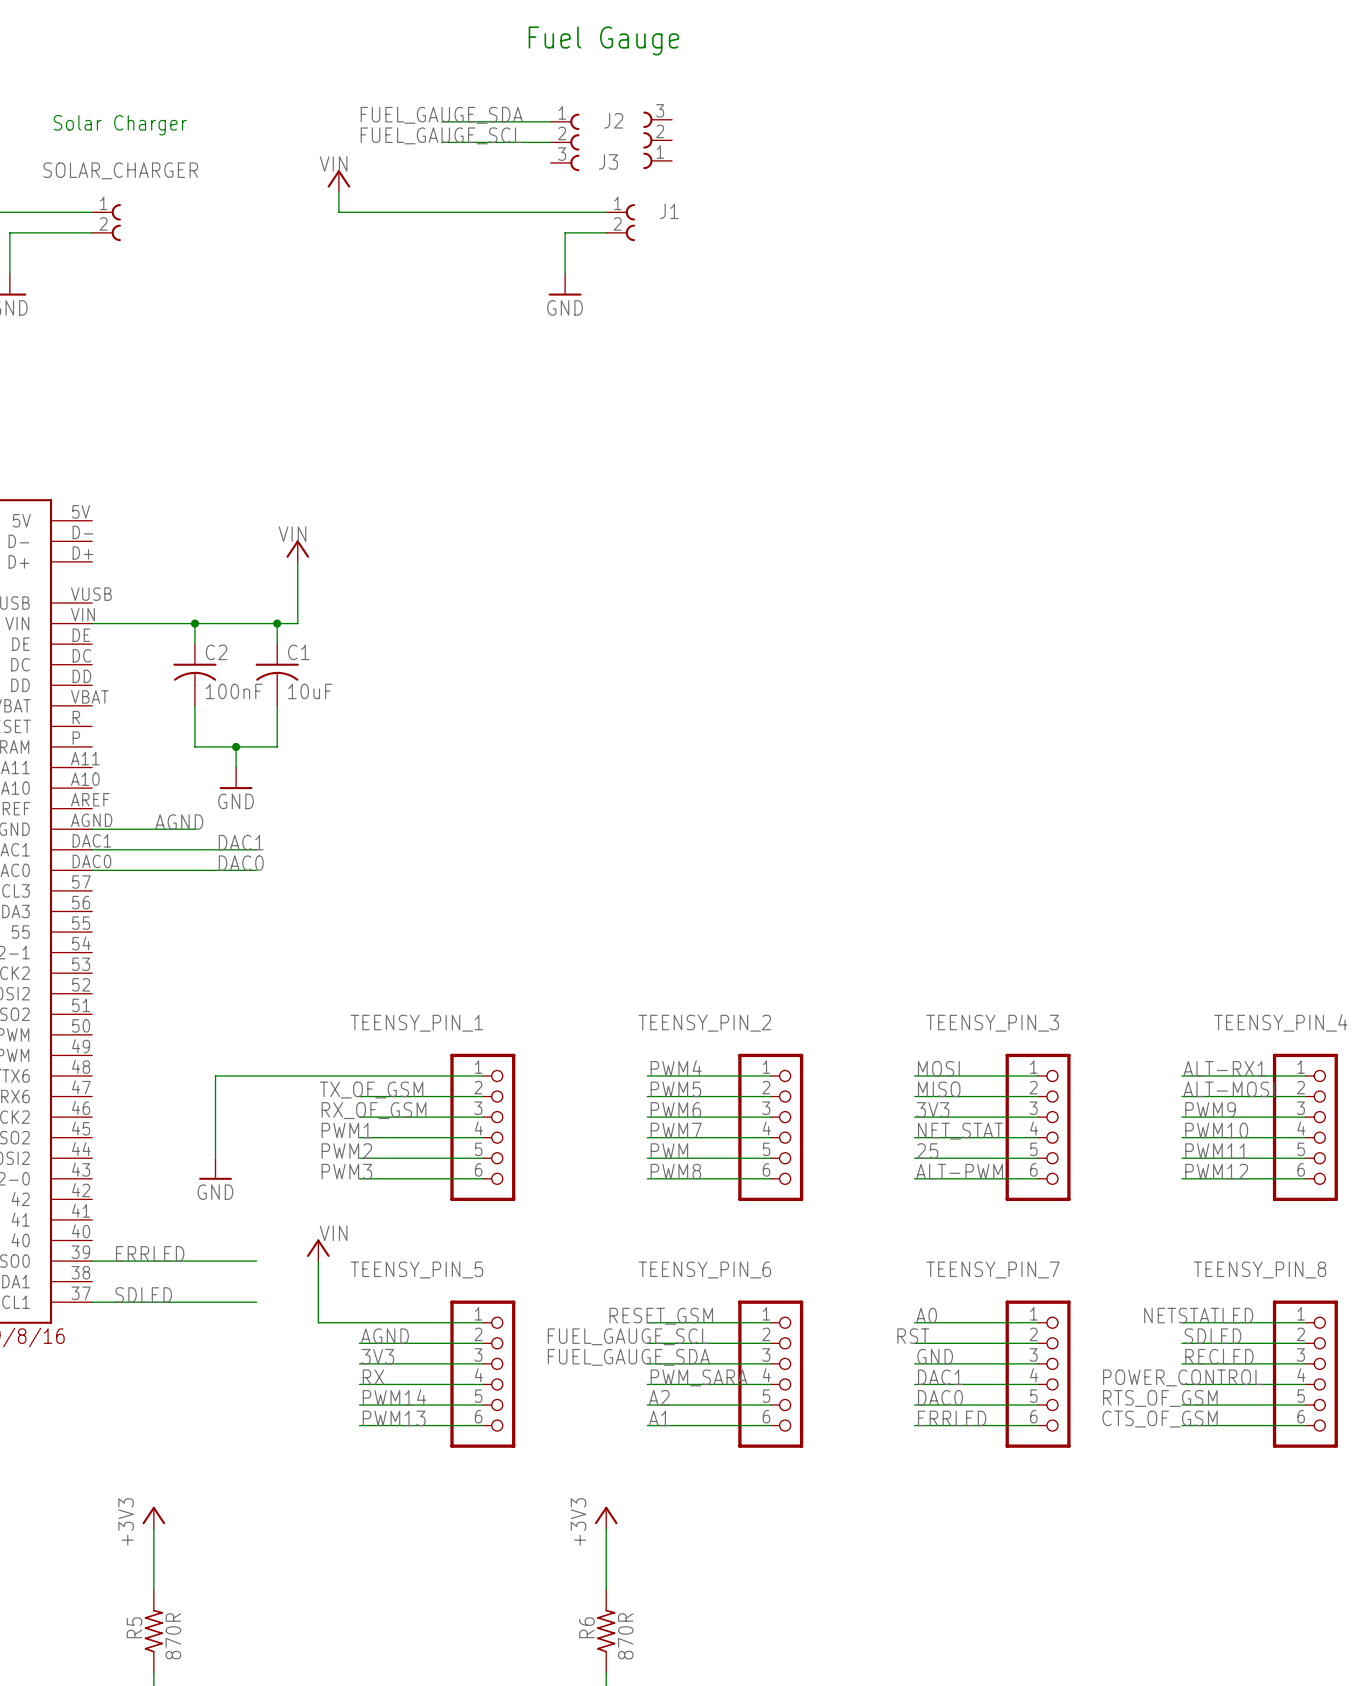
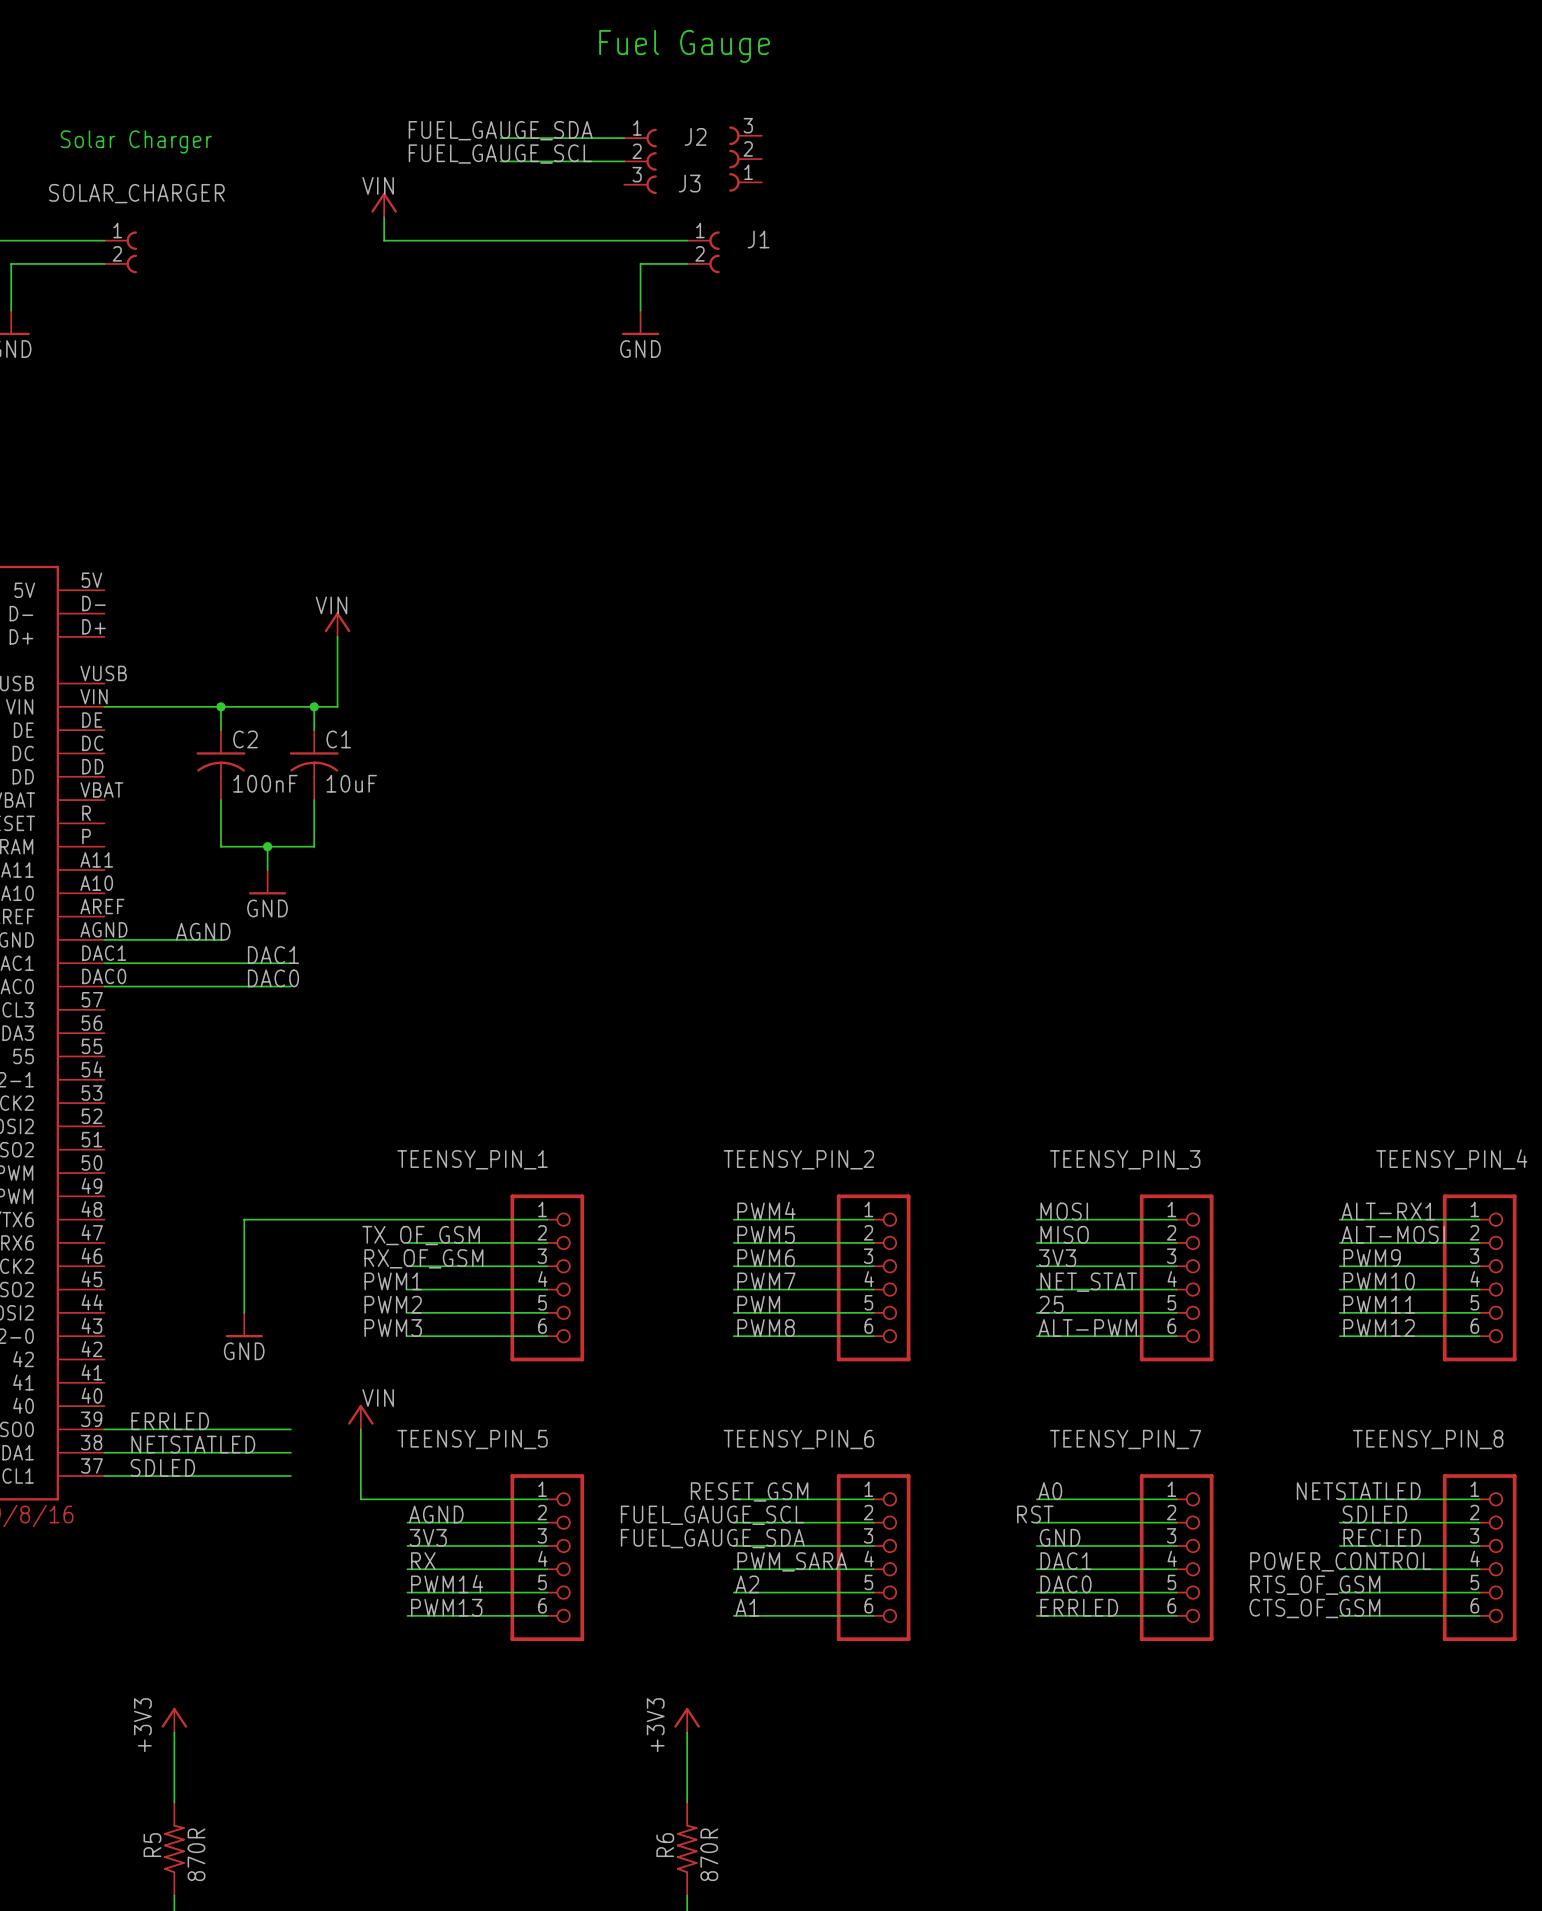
label: none -> NETSTATLED (193, 1444)
wire: none -> (104, 1452) (290, 1452)

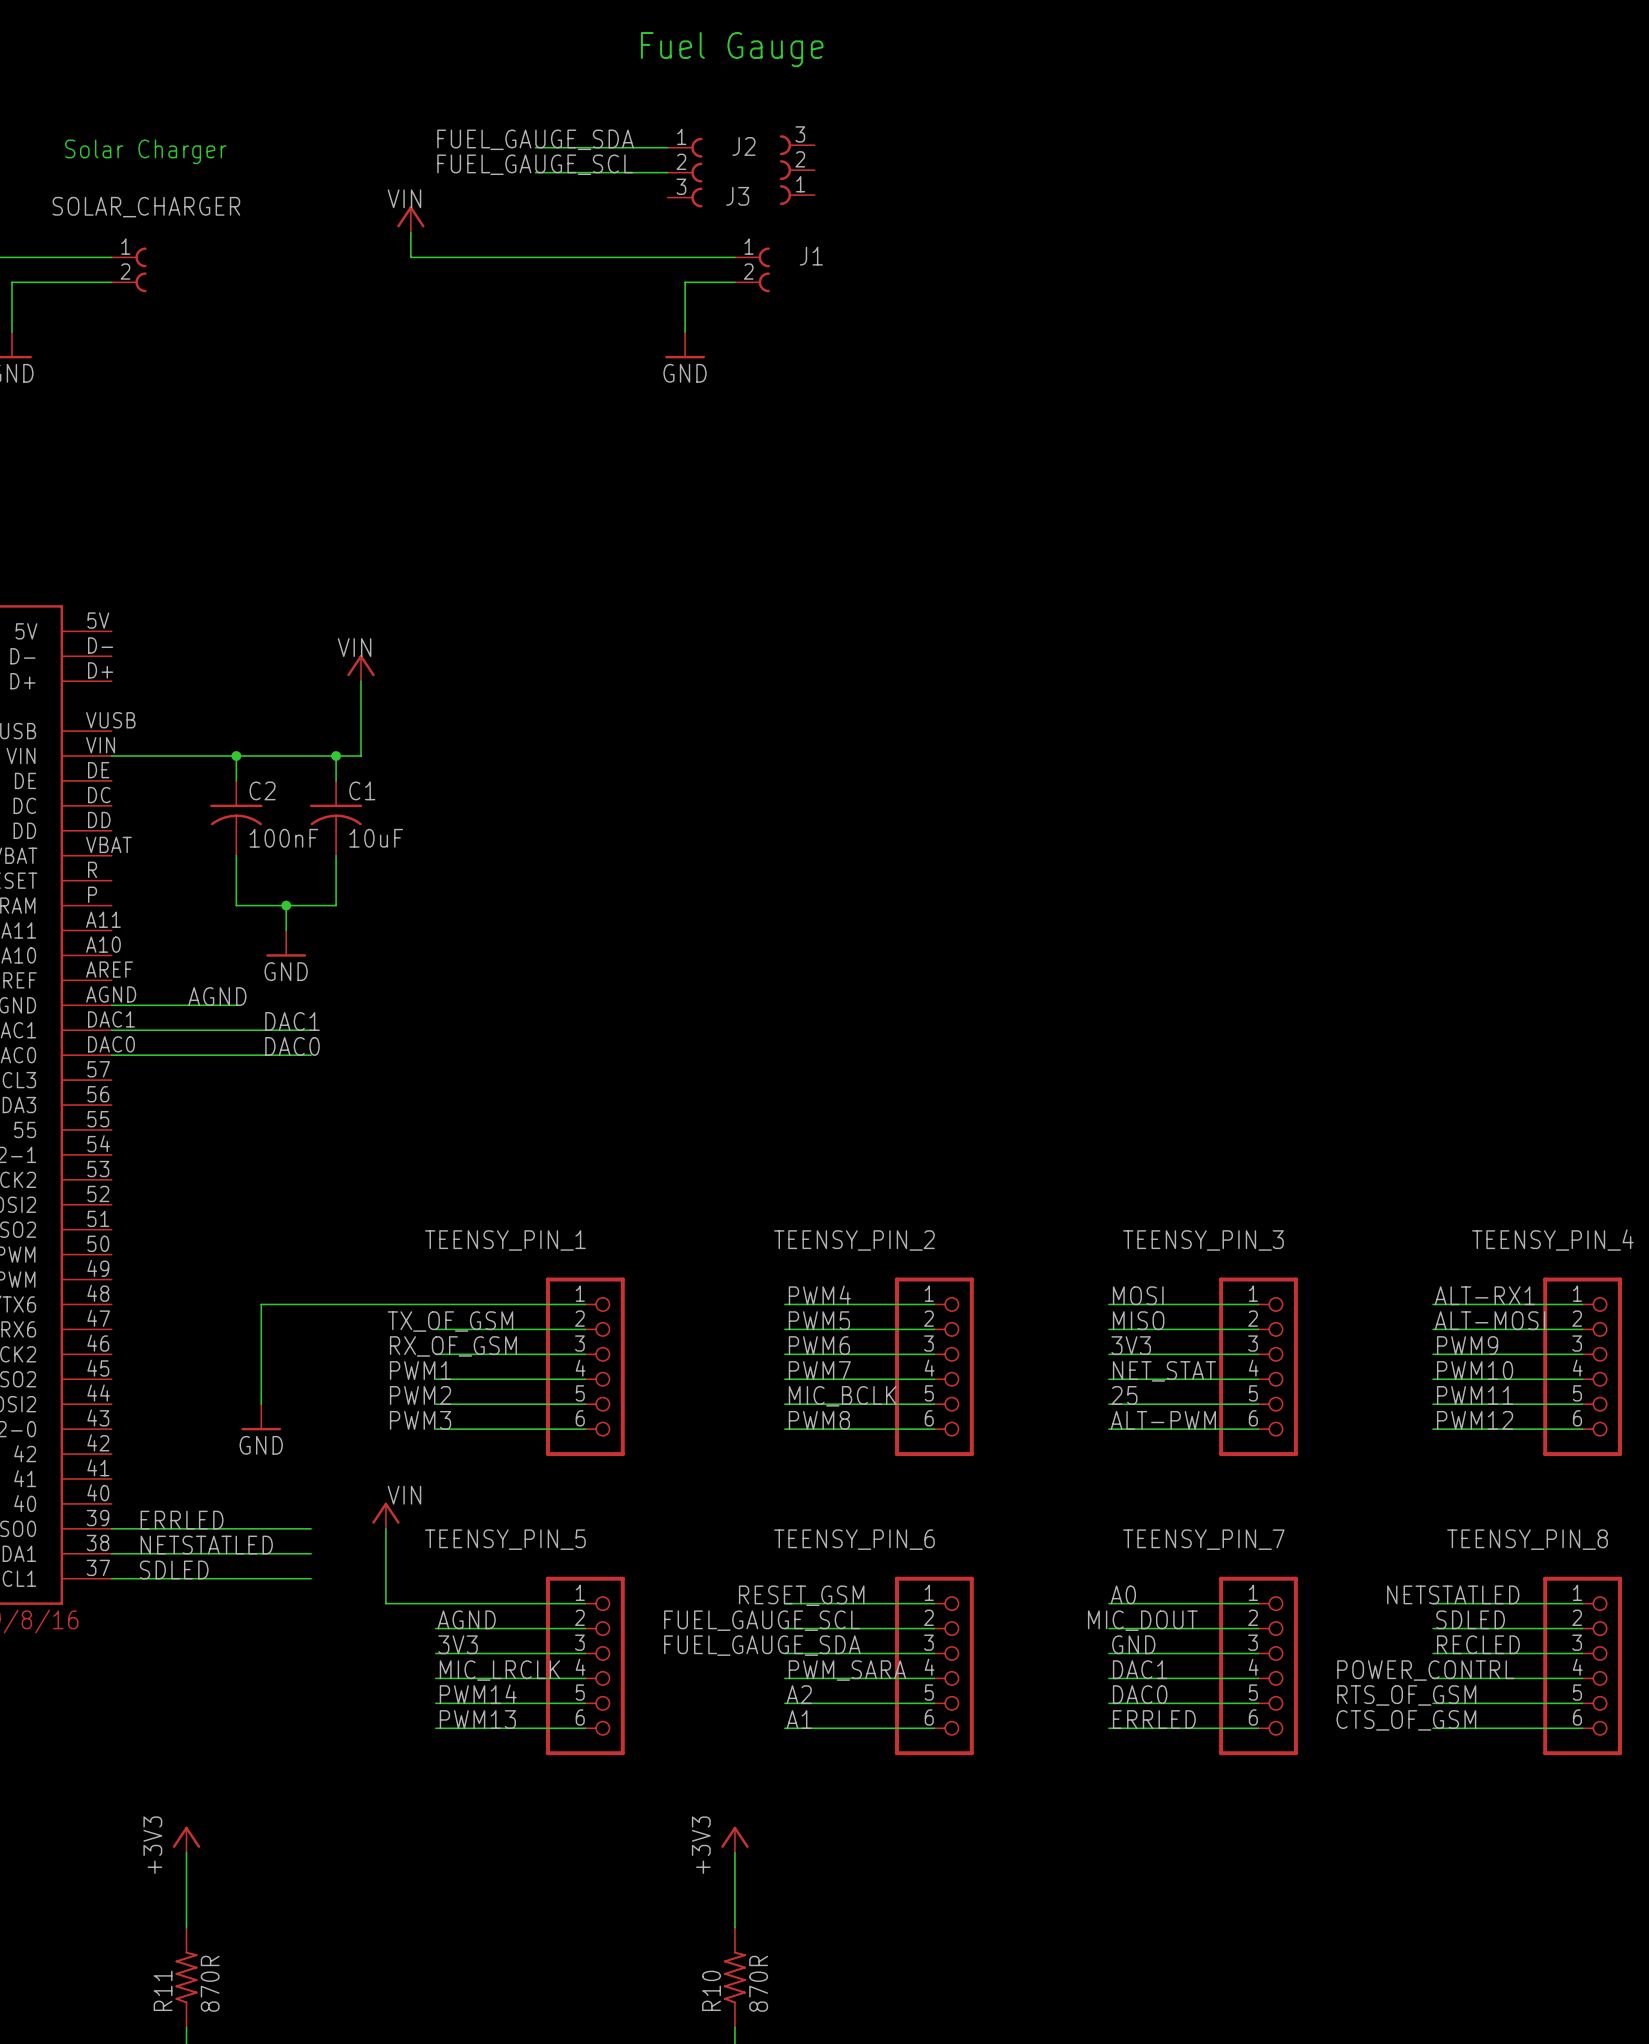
label: PWM (758, 1304) -> MIC_BCLK (842, 1396)
label: RST (1035, 1514) -> MIC_DOUT (1142, 1620)
label: RX (423, 1561) -> MIC_LRCLK (499, 1670)
label: POWER_CONTROL (1340, 1561) -> POWER_CONTRL (1425, 1670)
R5 name: R5 (152, 1845) -> R11 (163, 1990)
R6 name: R6 (665, 1845) -> R10 (711, 1990)

